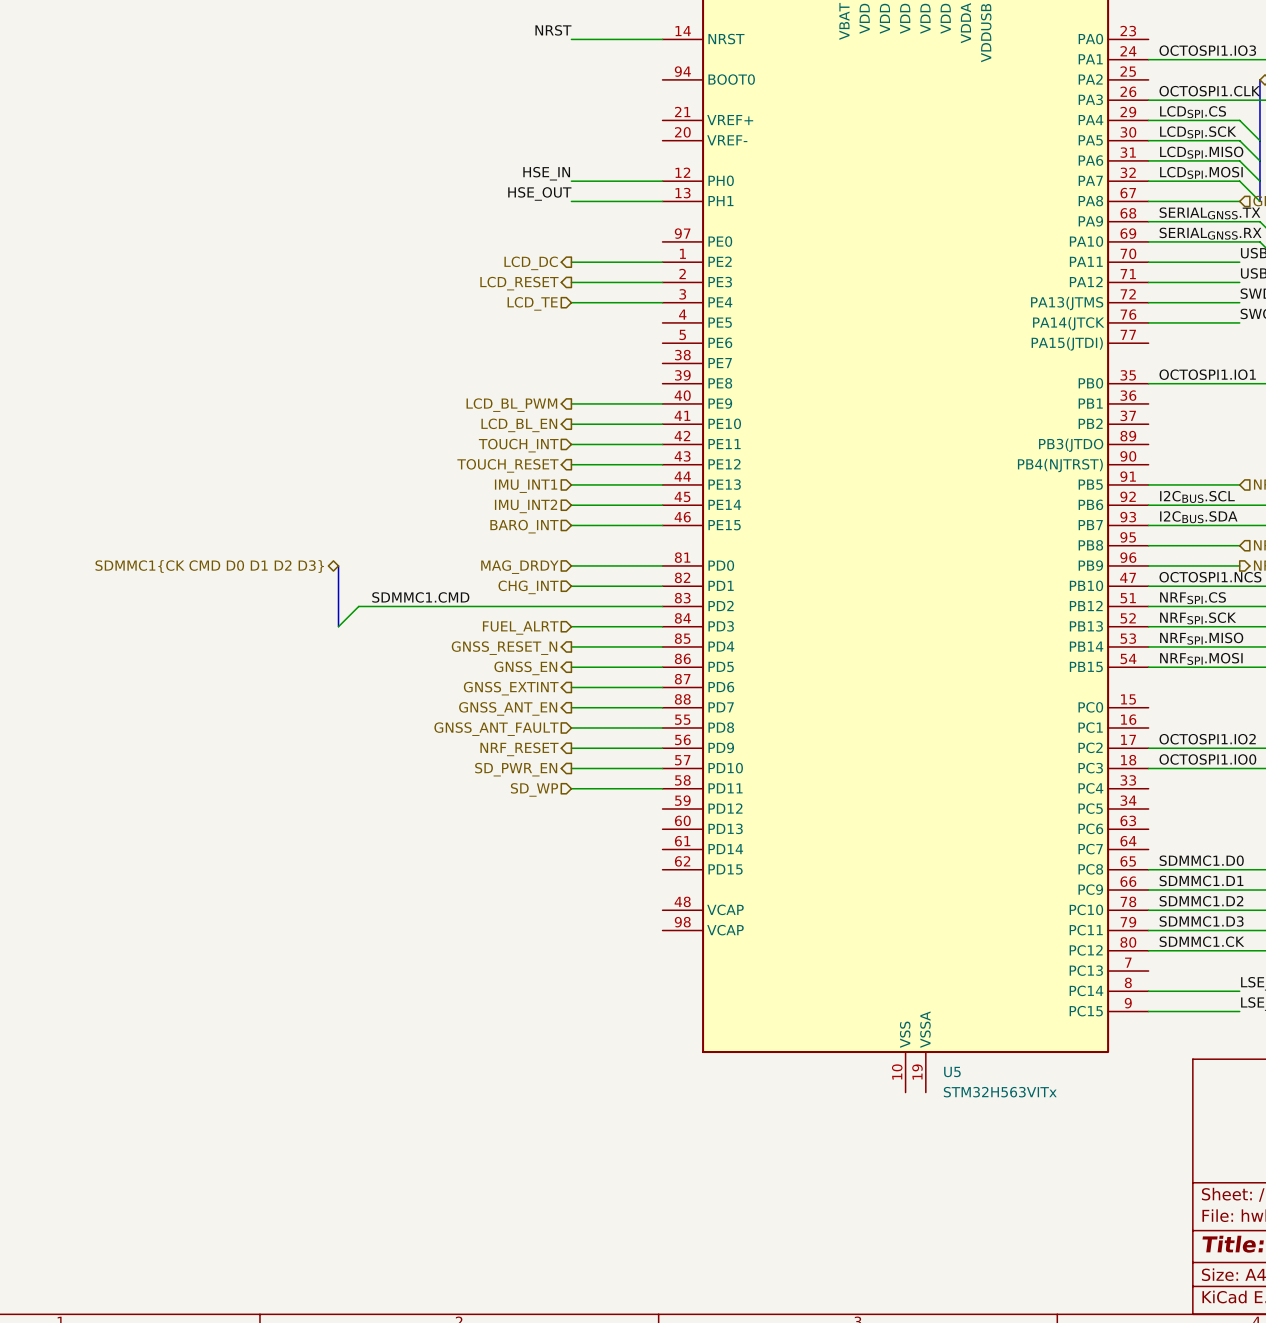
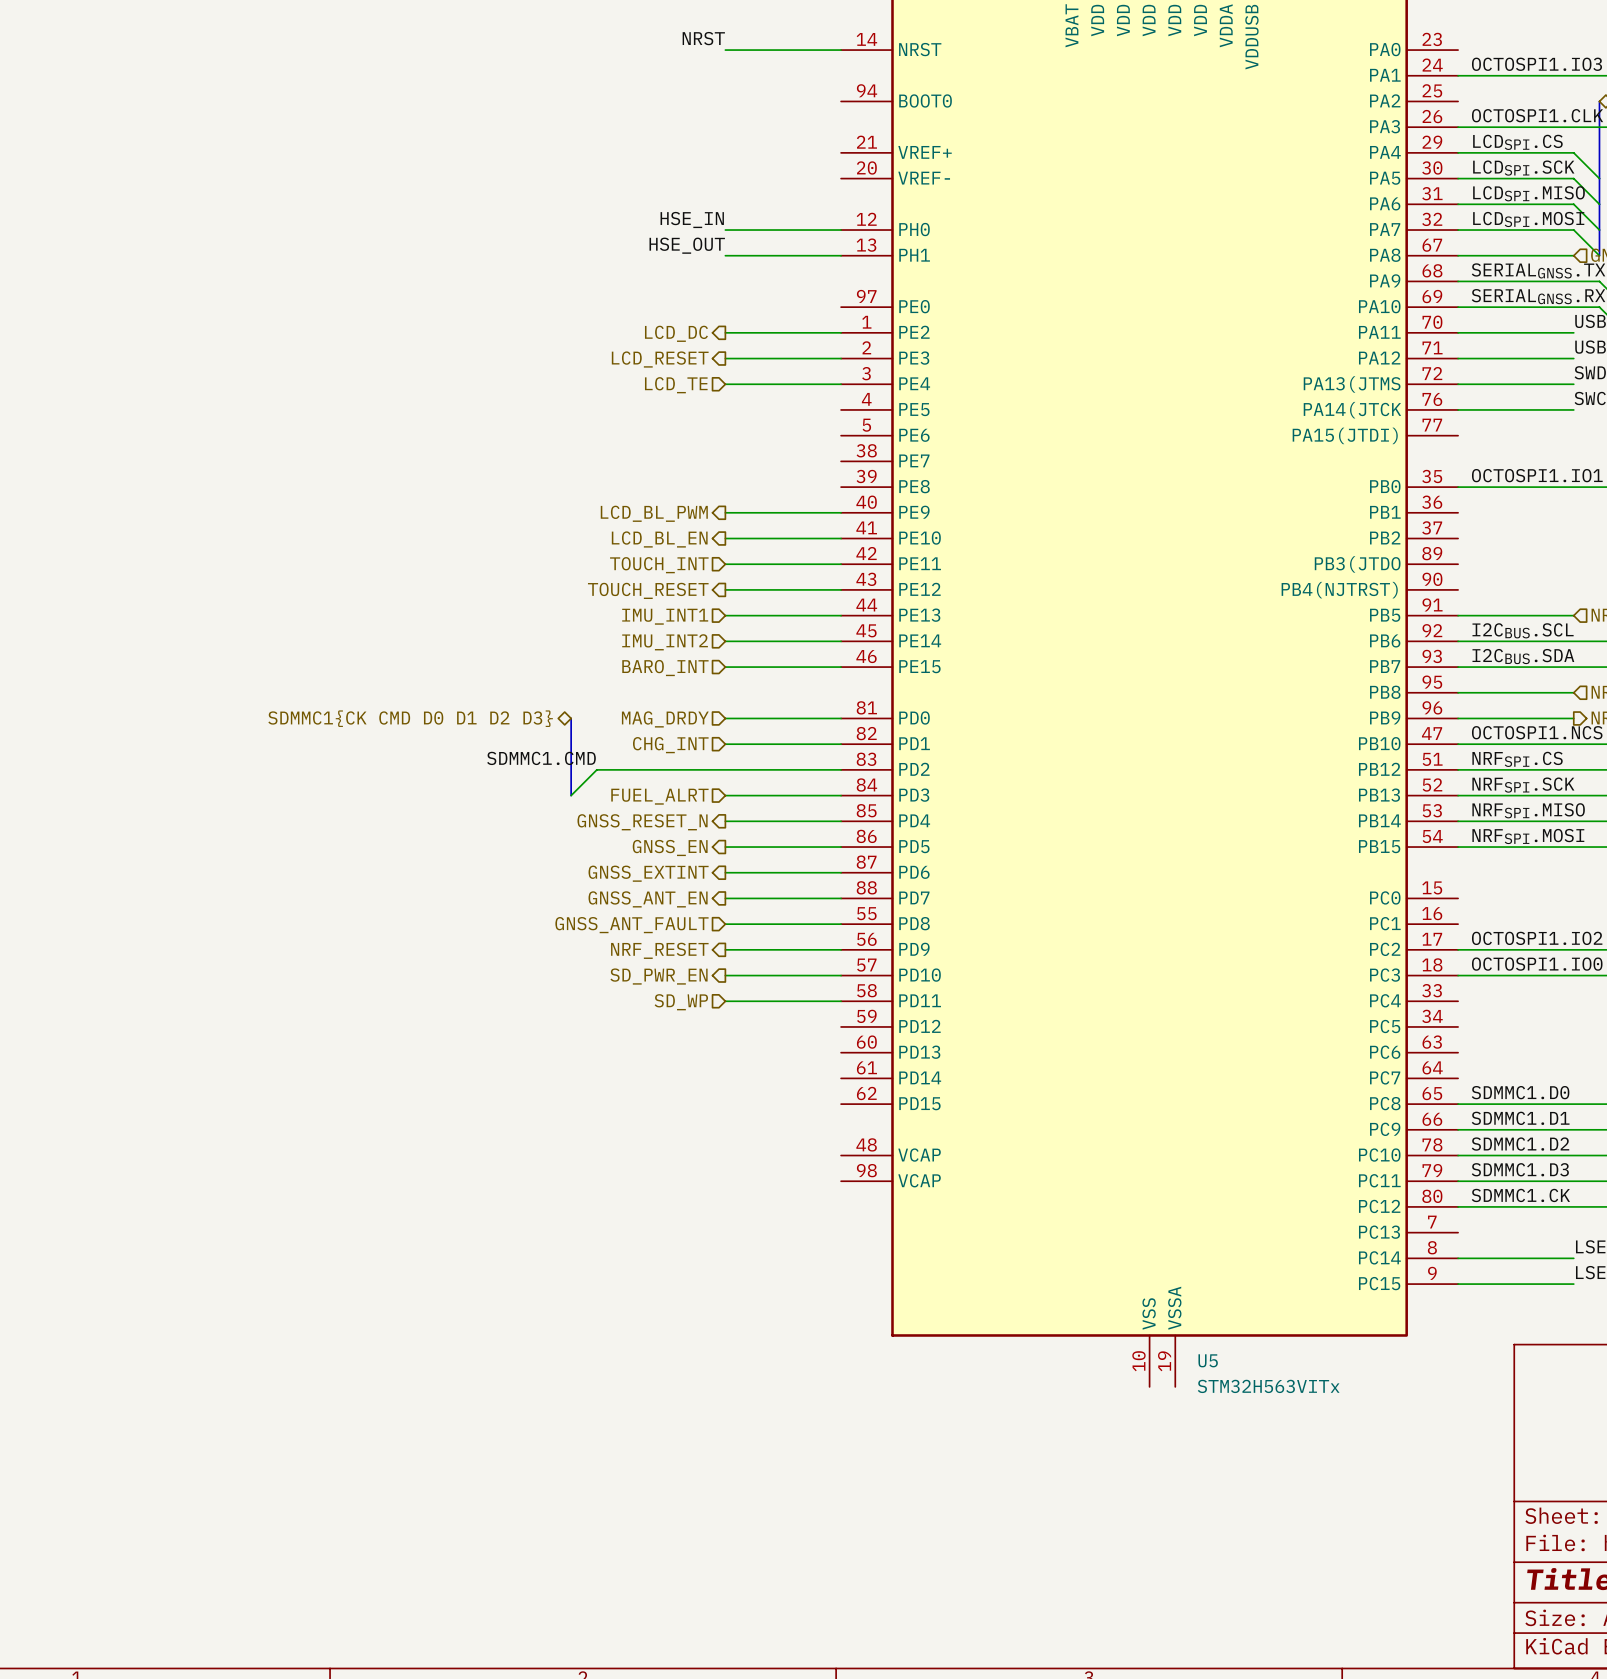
bus: (338, 565) (338, 626) -> (571, 718) (571, 795)
hierarchical label position: SDMMC1{CK CMD D0 D1 D2 D3} (209, 566) -> SDMMC1{CK CMD D0 D1 D2 D3} (410, 718)
wire: (470, 606) (358, 606) (338, 626) -> (596, 769) (571, 795)

